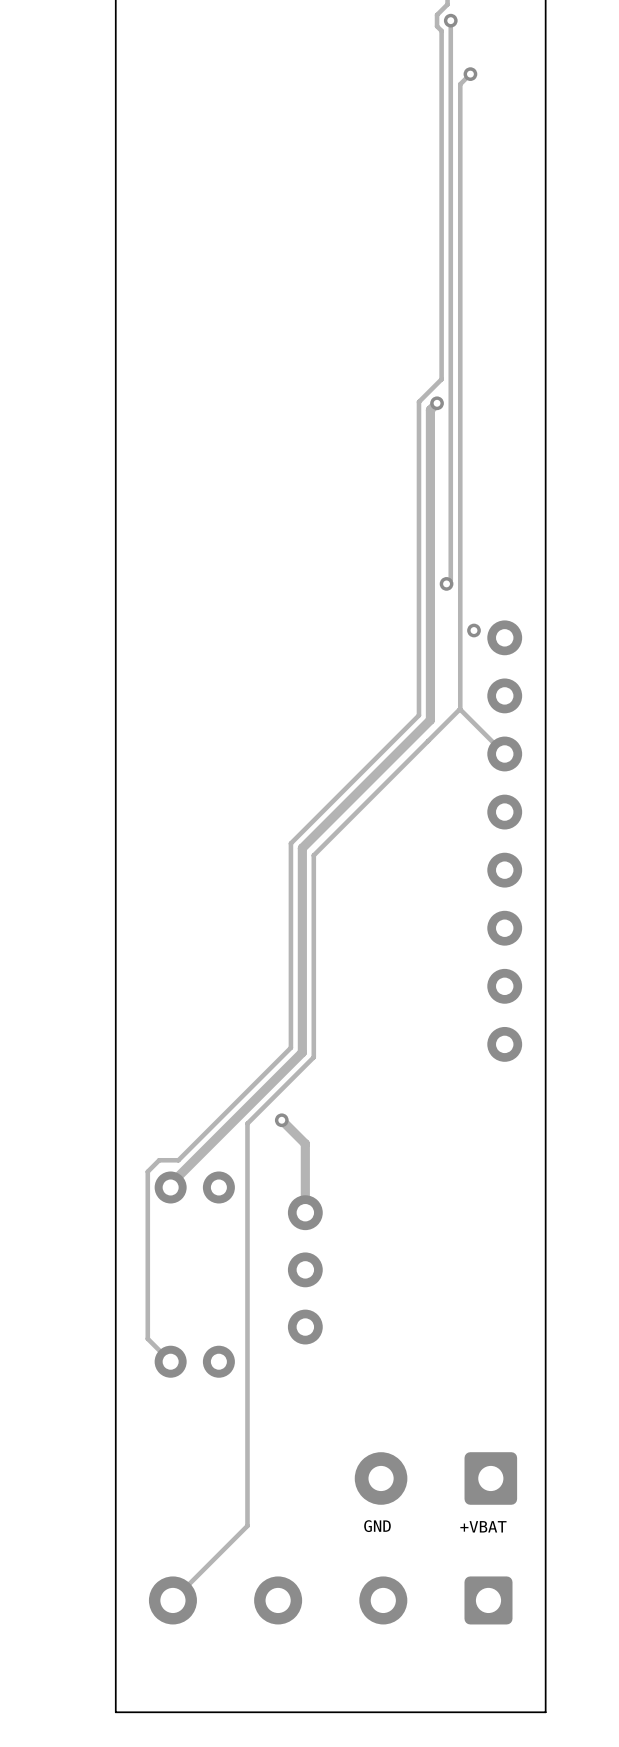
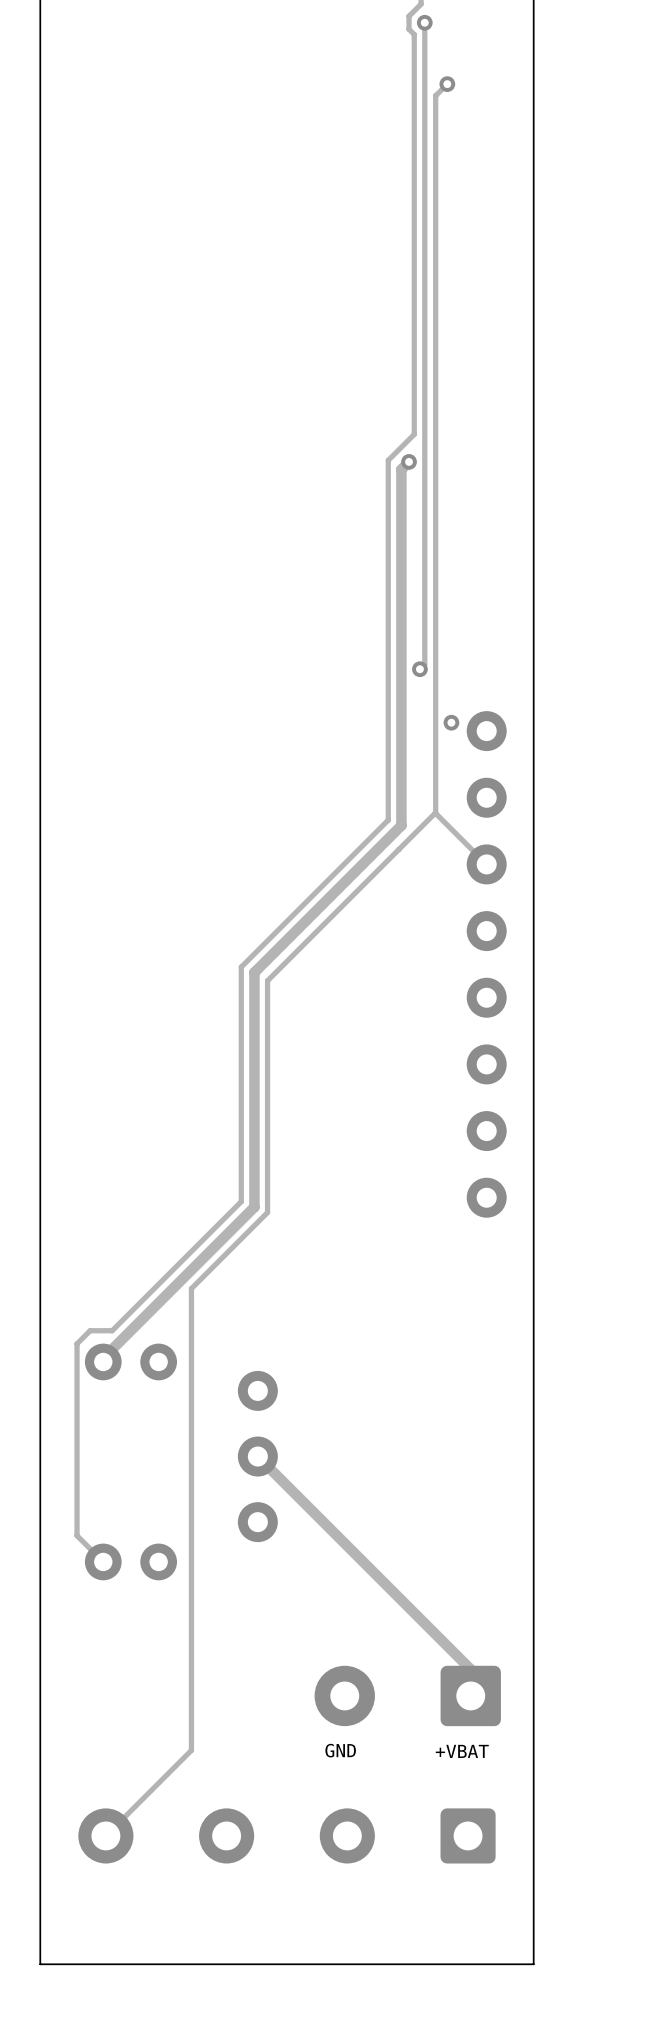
track: (281, 1120) (305, 1143) (305, 1212) -> none
via: (281, 1120) -> none
track: none -> (257, 1456) (470, 1669) (470, 1695)

